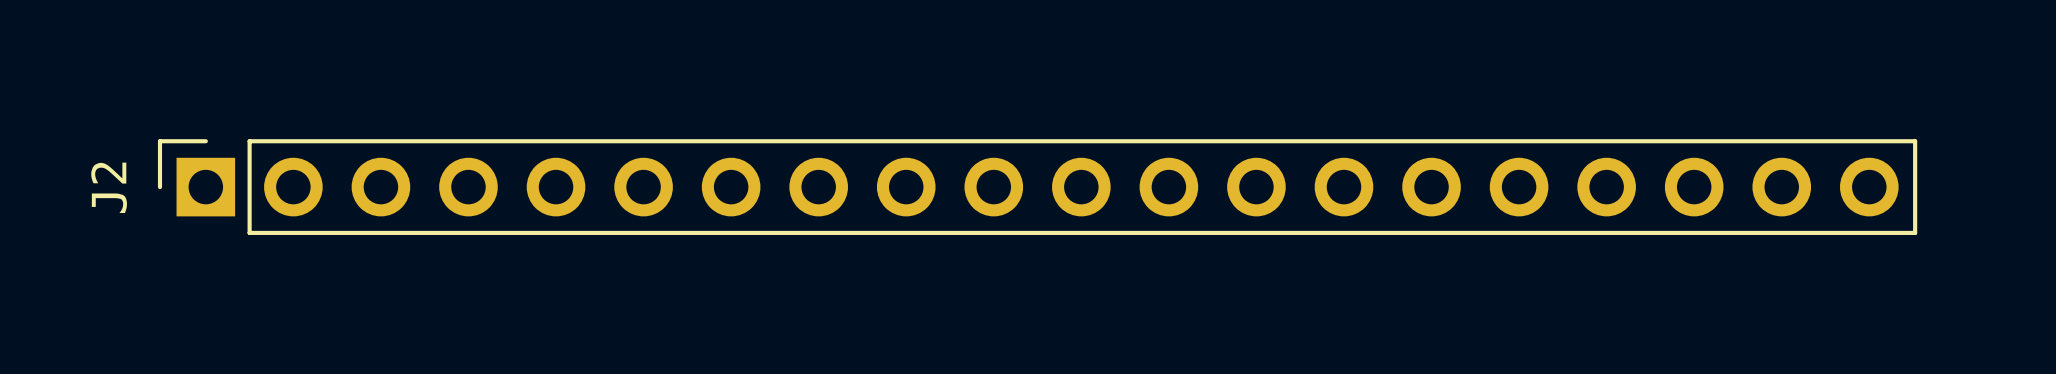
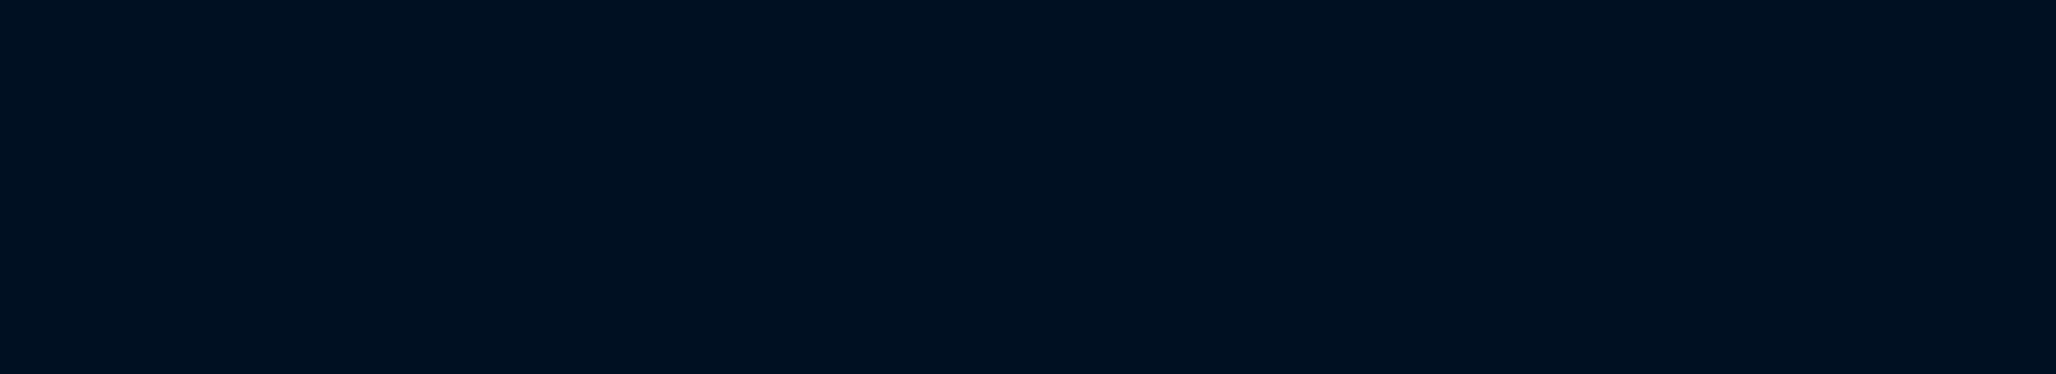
J2: (1037, 187) -> none

